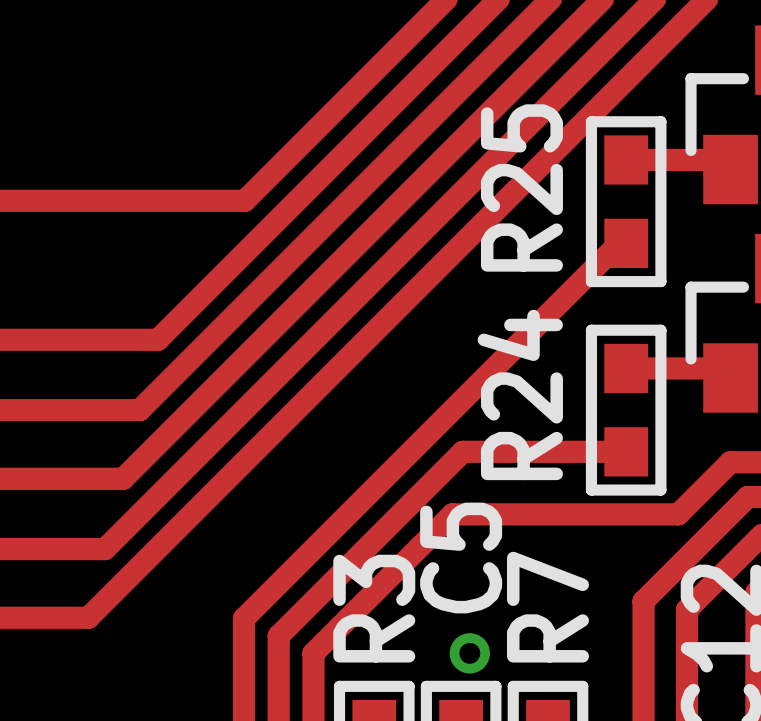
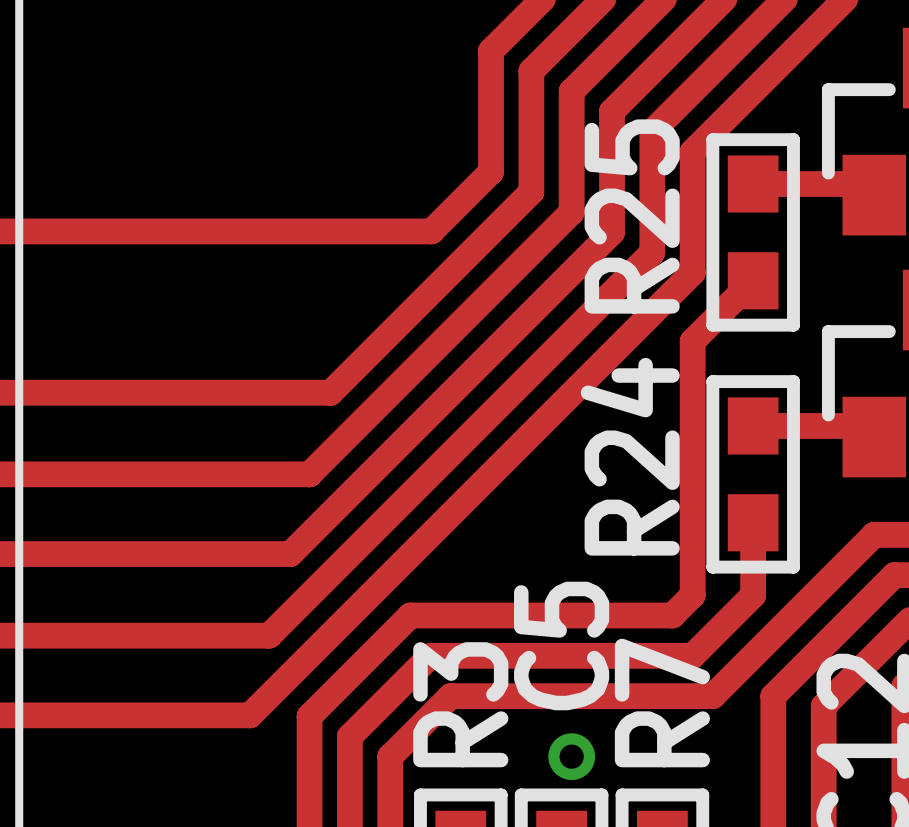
top track: (400, 45) (244, 200) -> (431, 231) (310, 231)
top track: (435, 62) (157, 339) -> none
top track: (469, 80) (400, 149) -> (491, 50) (491, 171)
top track: (504, 97) (435, 166) -> (531, 71) (531, 192)
top track: (539, 114) (469, 184) -> (571, 91) (571, 212)
top track: none -> (652, 131) (652, 252) (269, 635) (148, 635)
top track: (574, 132) (504, 201) -> (612, 111) (612, 232)
top track: none -> (692, 151) (692, 272) (250, 715) (129, 715)
top track: (349, 200) (139, 410) -> none
top track: (626, 243) (626, 236) (330, 531) -> (753, 280) (692, 341) (692, 595) (672, 615) (410, 615)
top track: (262, 339) (123, 478) -> (330, 392) (209, 392)
top track: (243, 410) (105, 549) -> (309, 474) (188, 474)
top track: (626, 451) (462, 451) (348, 566) -> (753, 522) (753, 595) (692, 655) (430, 655)
top track: (227, 478) (88, 617) -> (290, 554) (169, 554)
top track: (678, 514) (452, 514) (365, 601) -> (813, 595) (712, 696) (450, 696)

